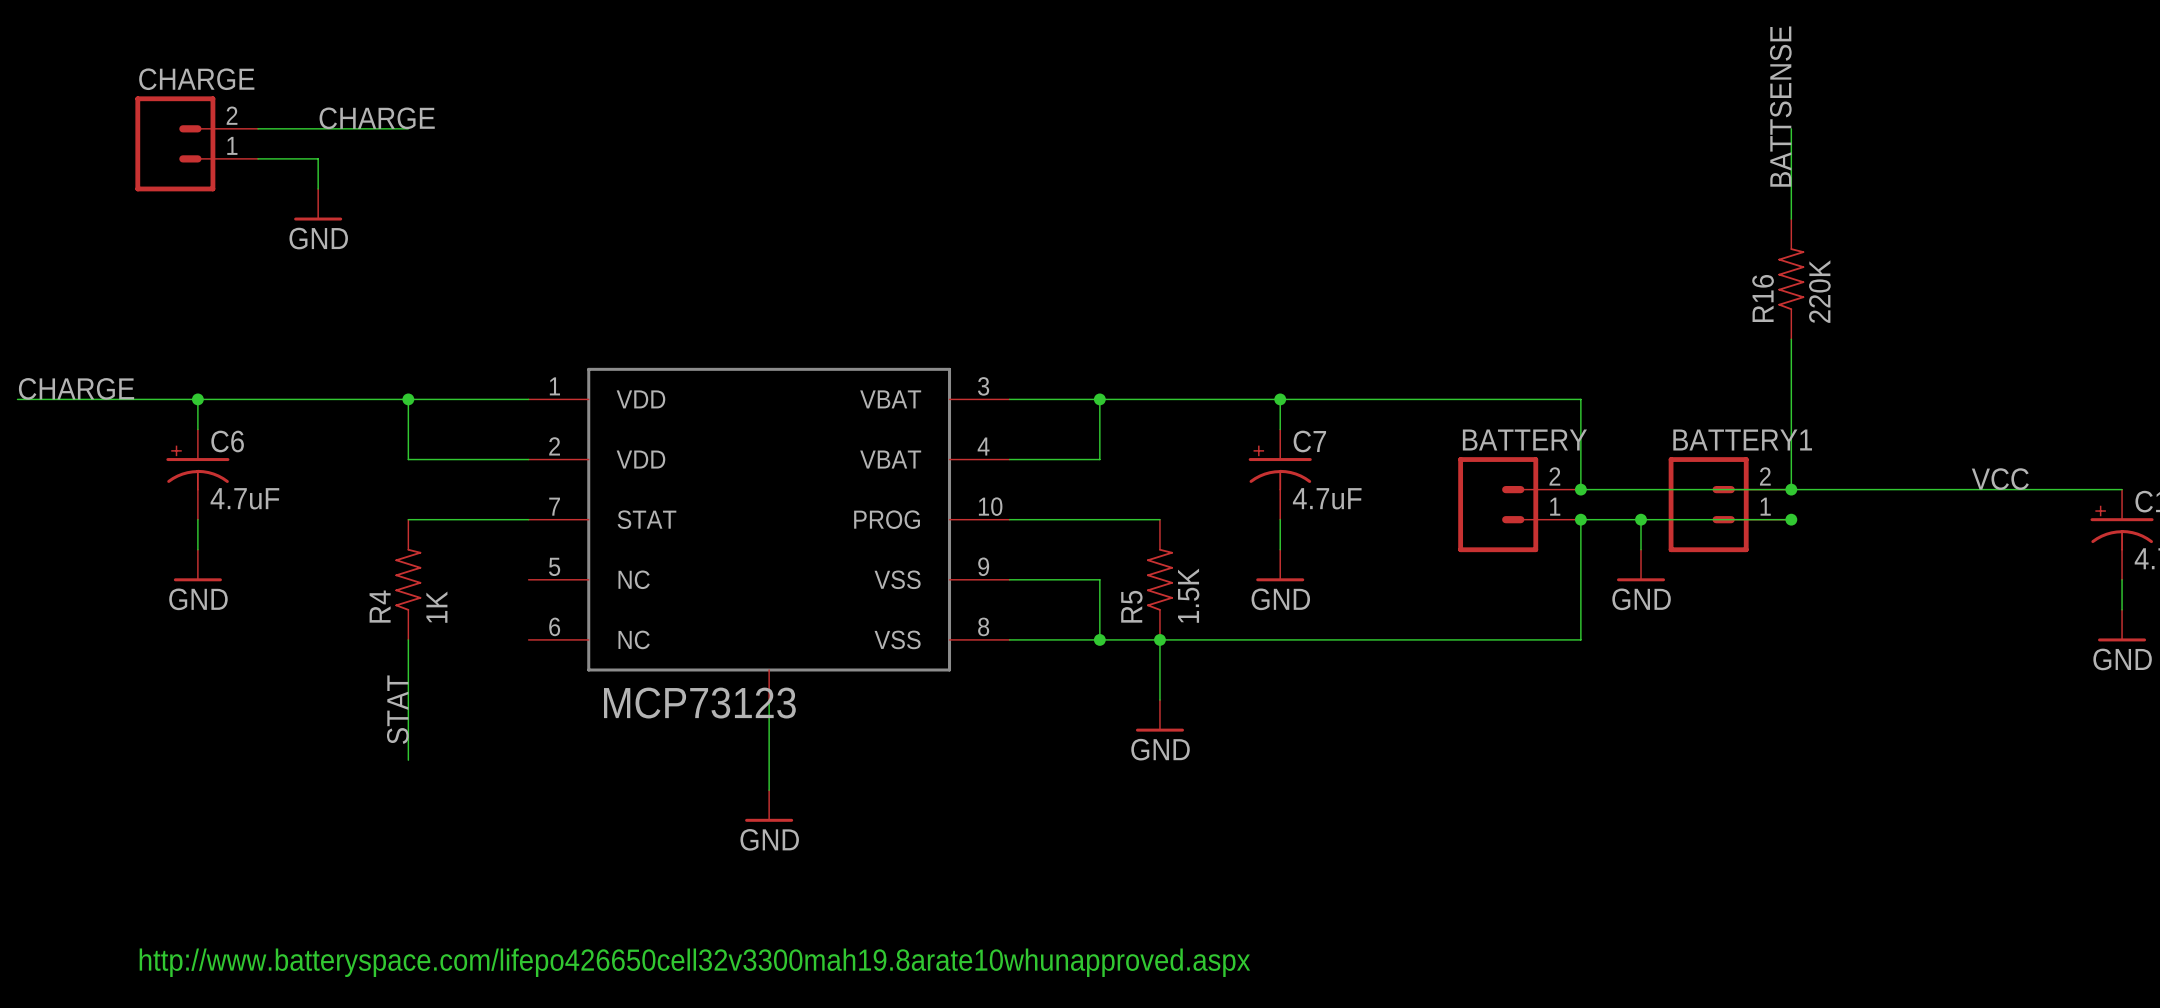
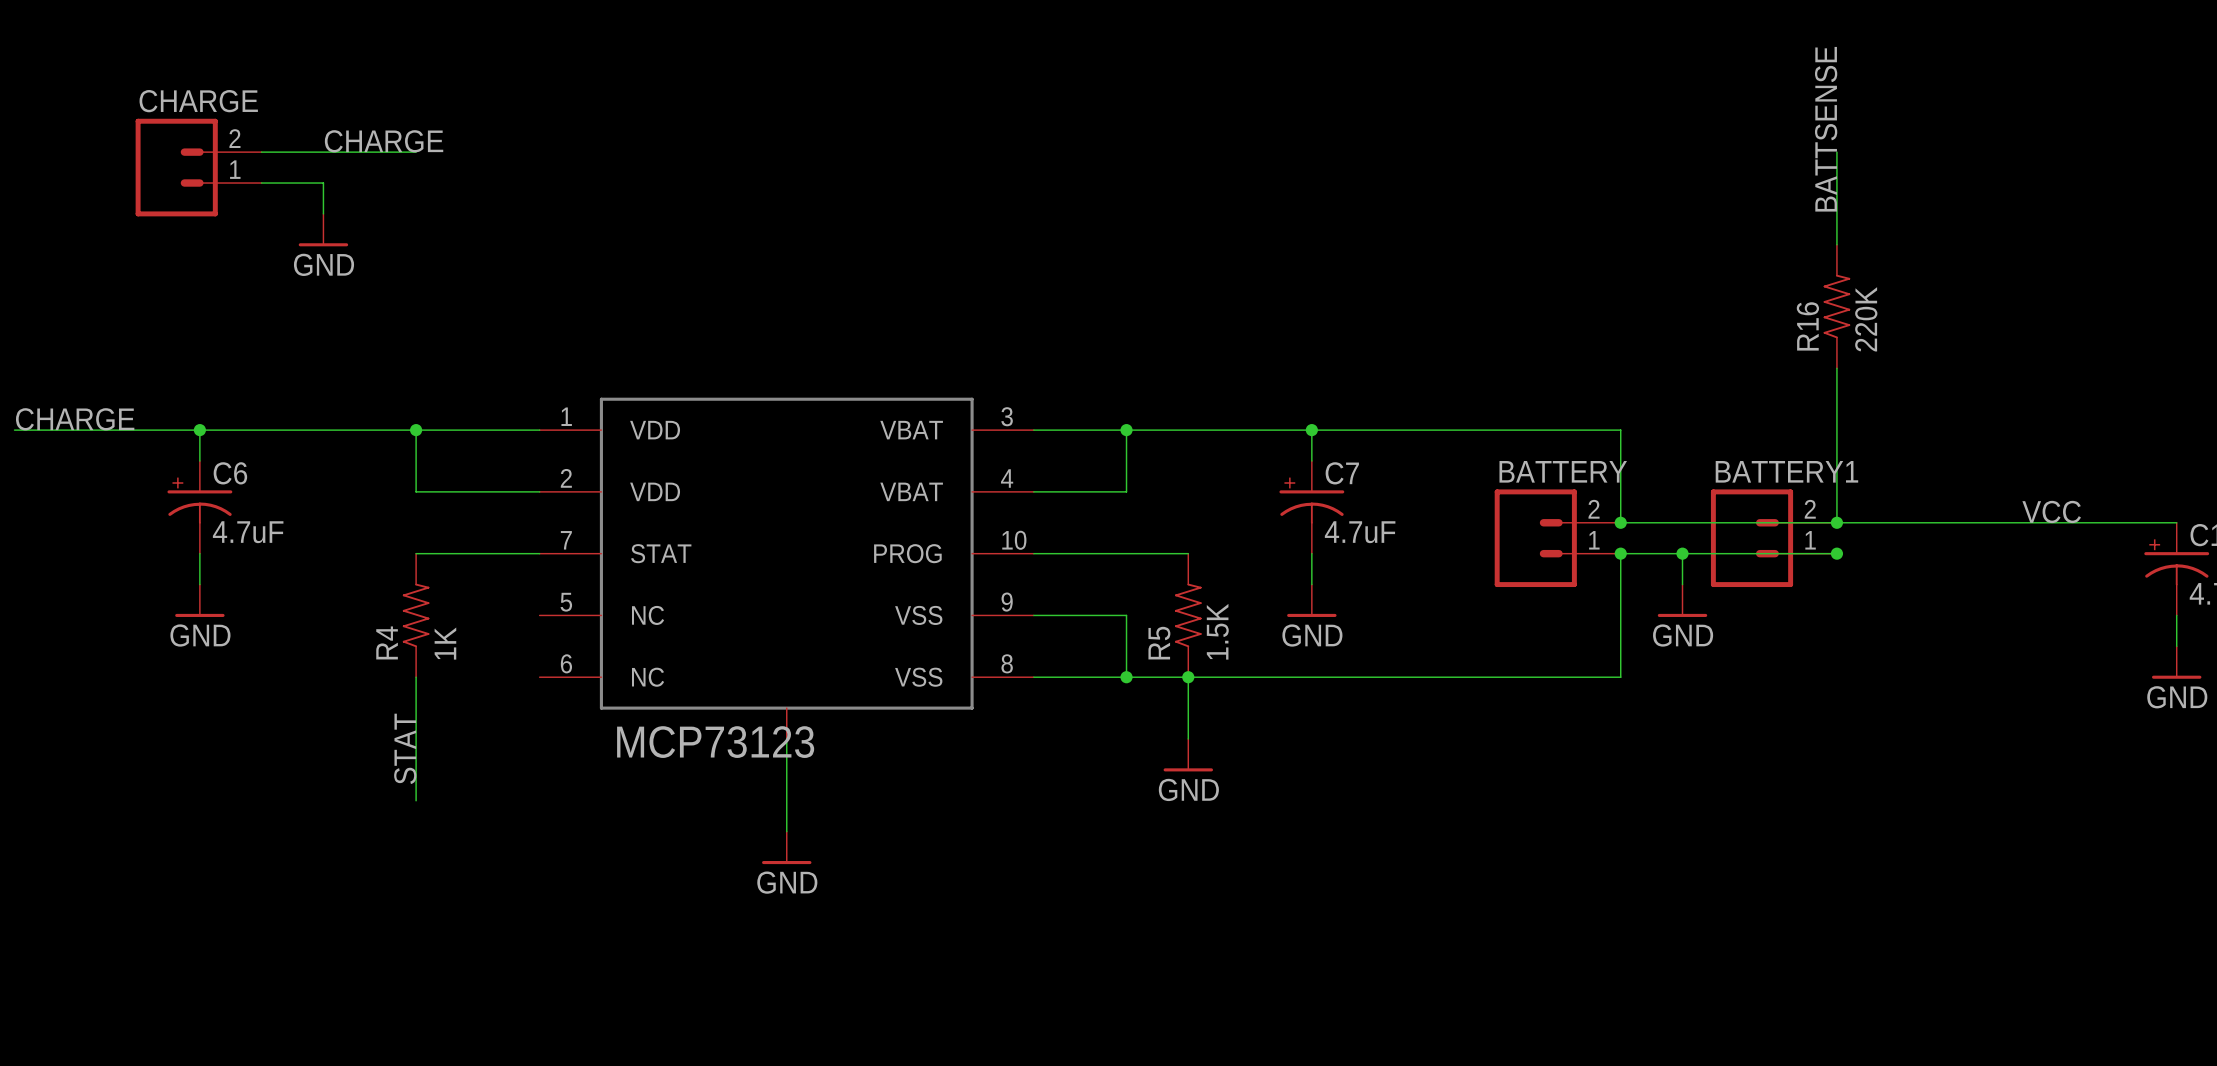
text: http://www.batteryspace.com/lifepo426650cell32v3300mah19.8arate10whunapproved.aspx (694, 962) -> none

